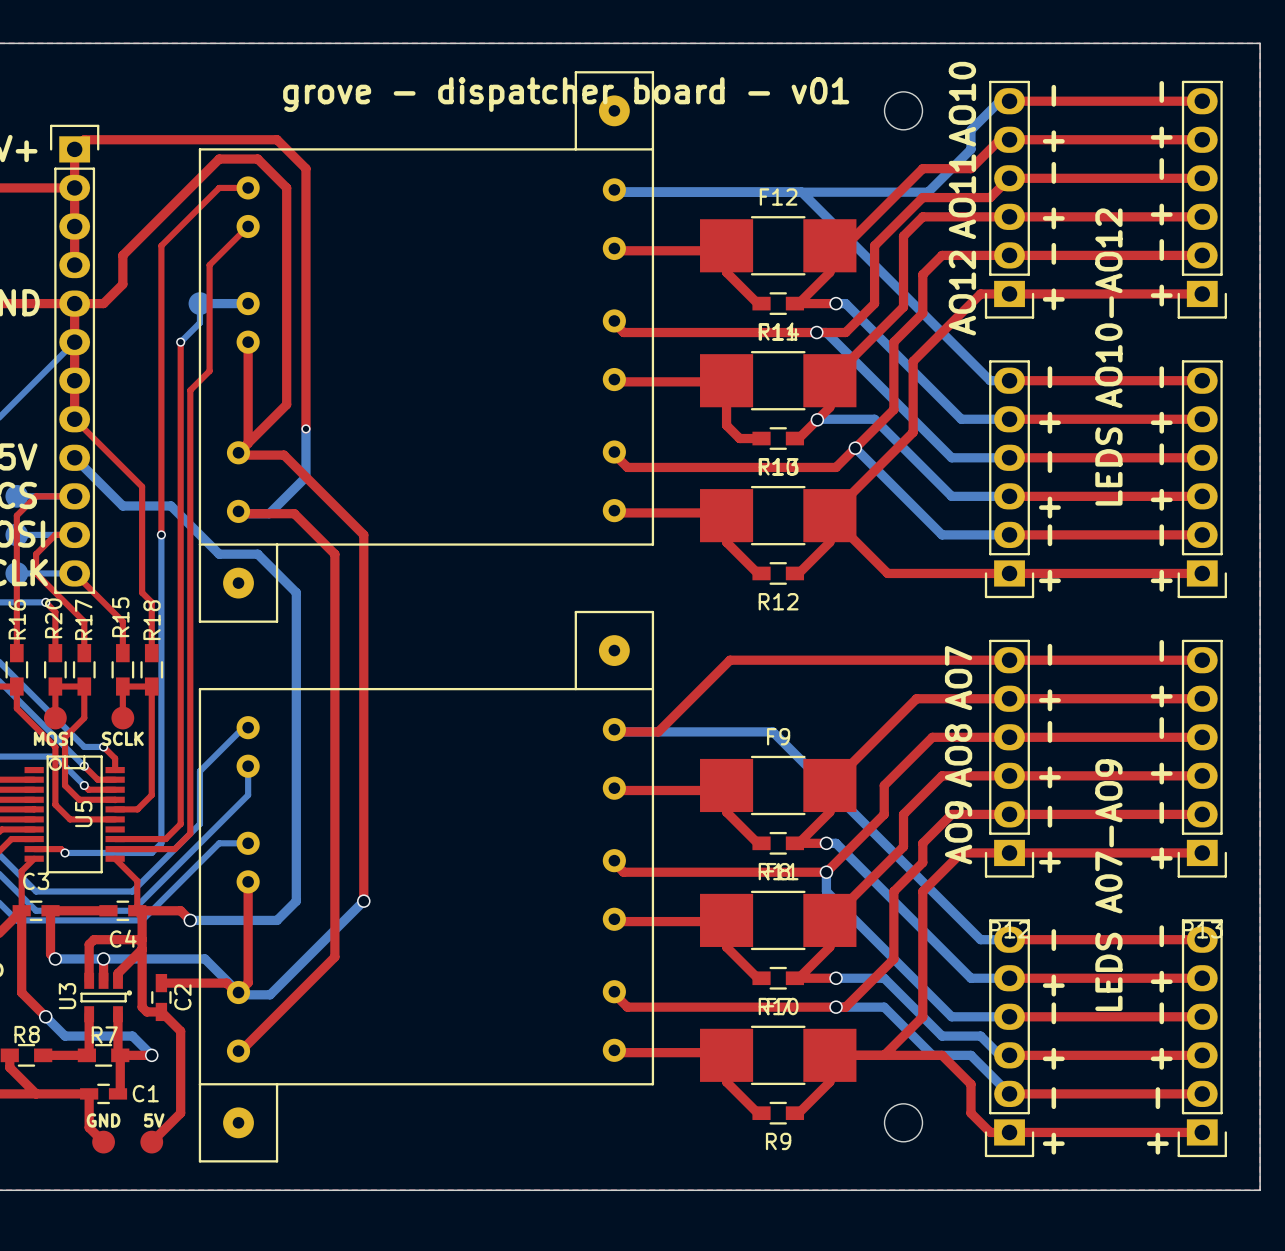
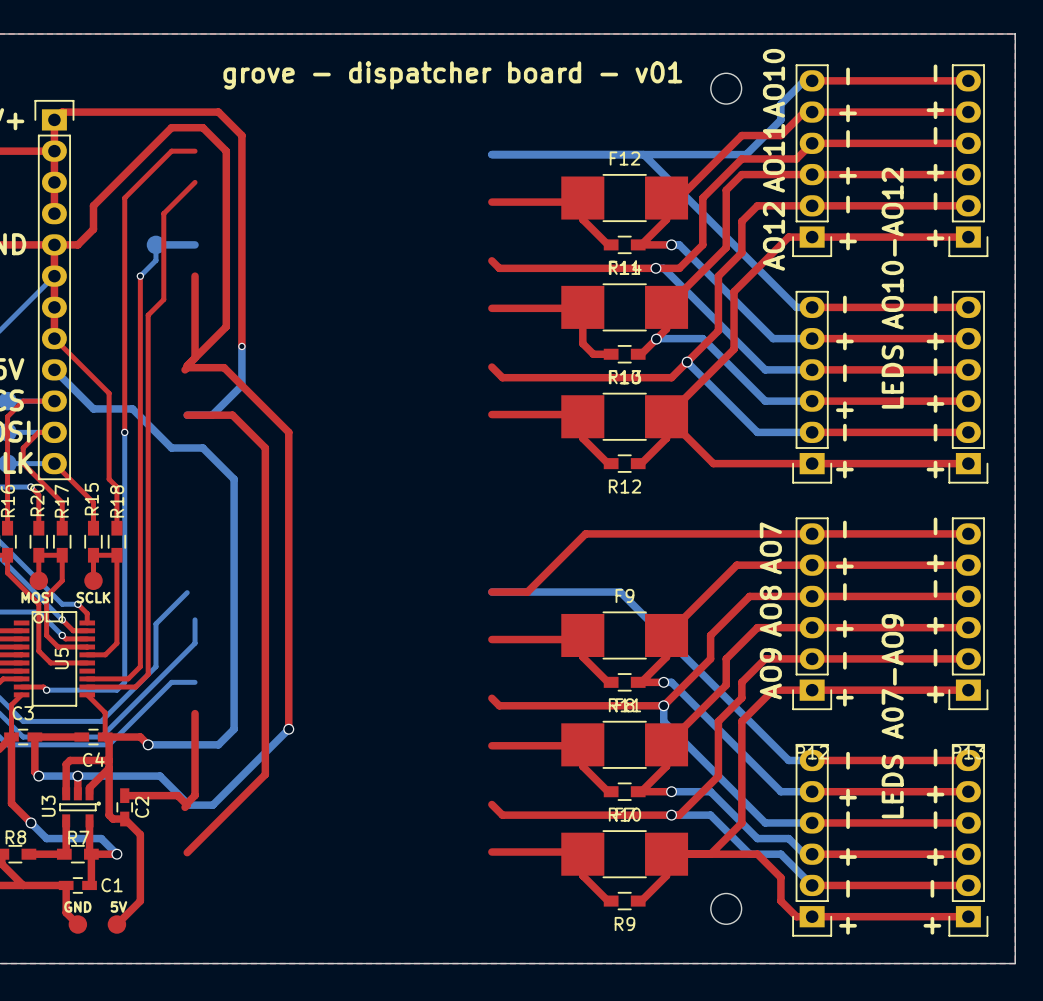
part: (426, 346) -> none
part: (426, 886) -> none

